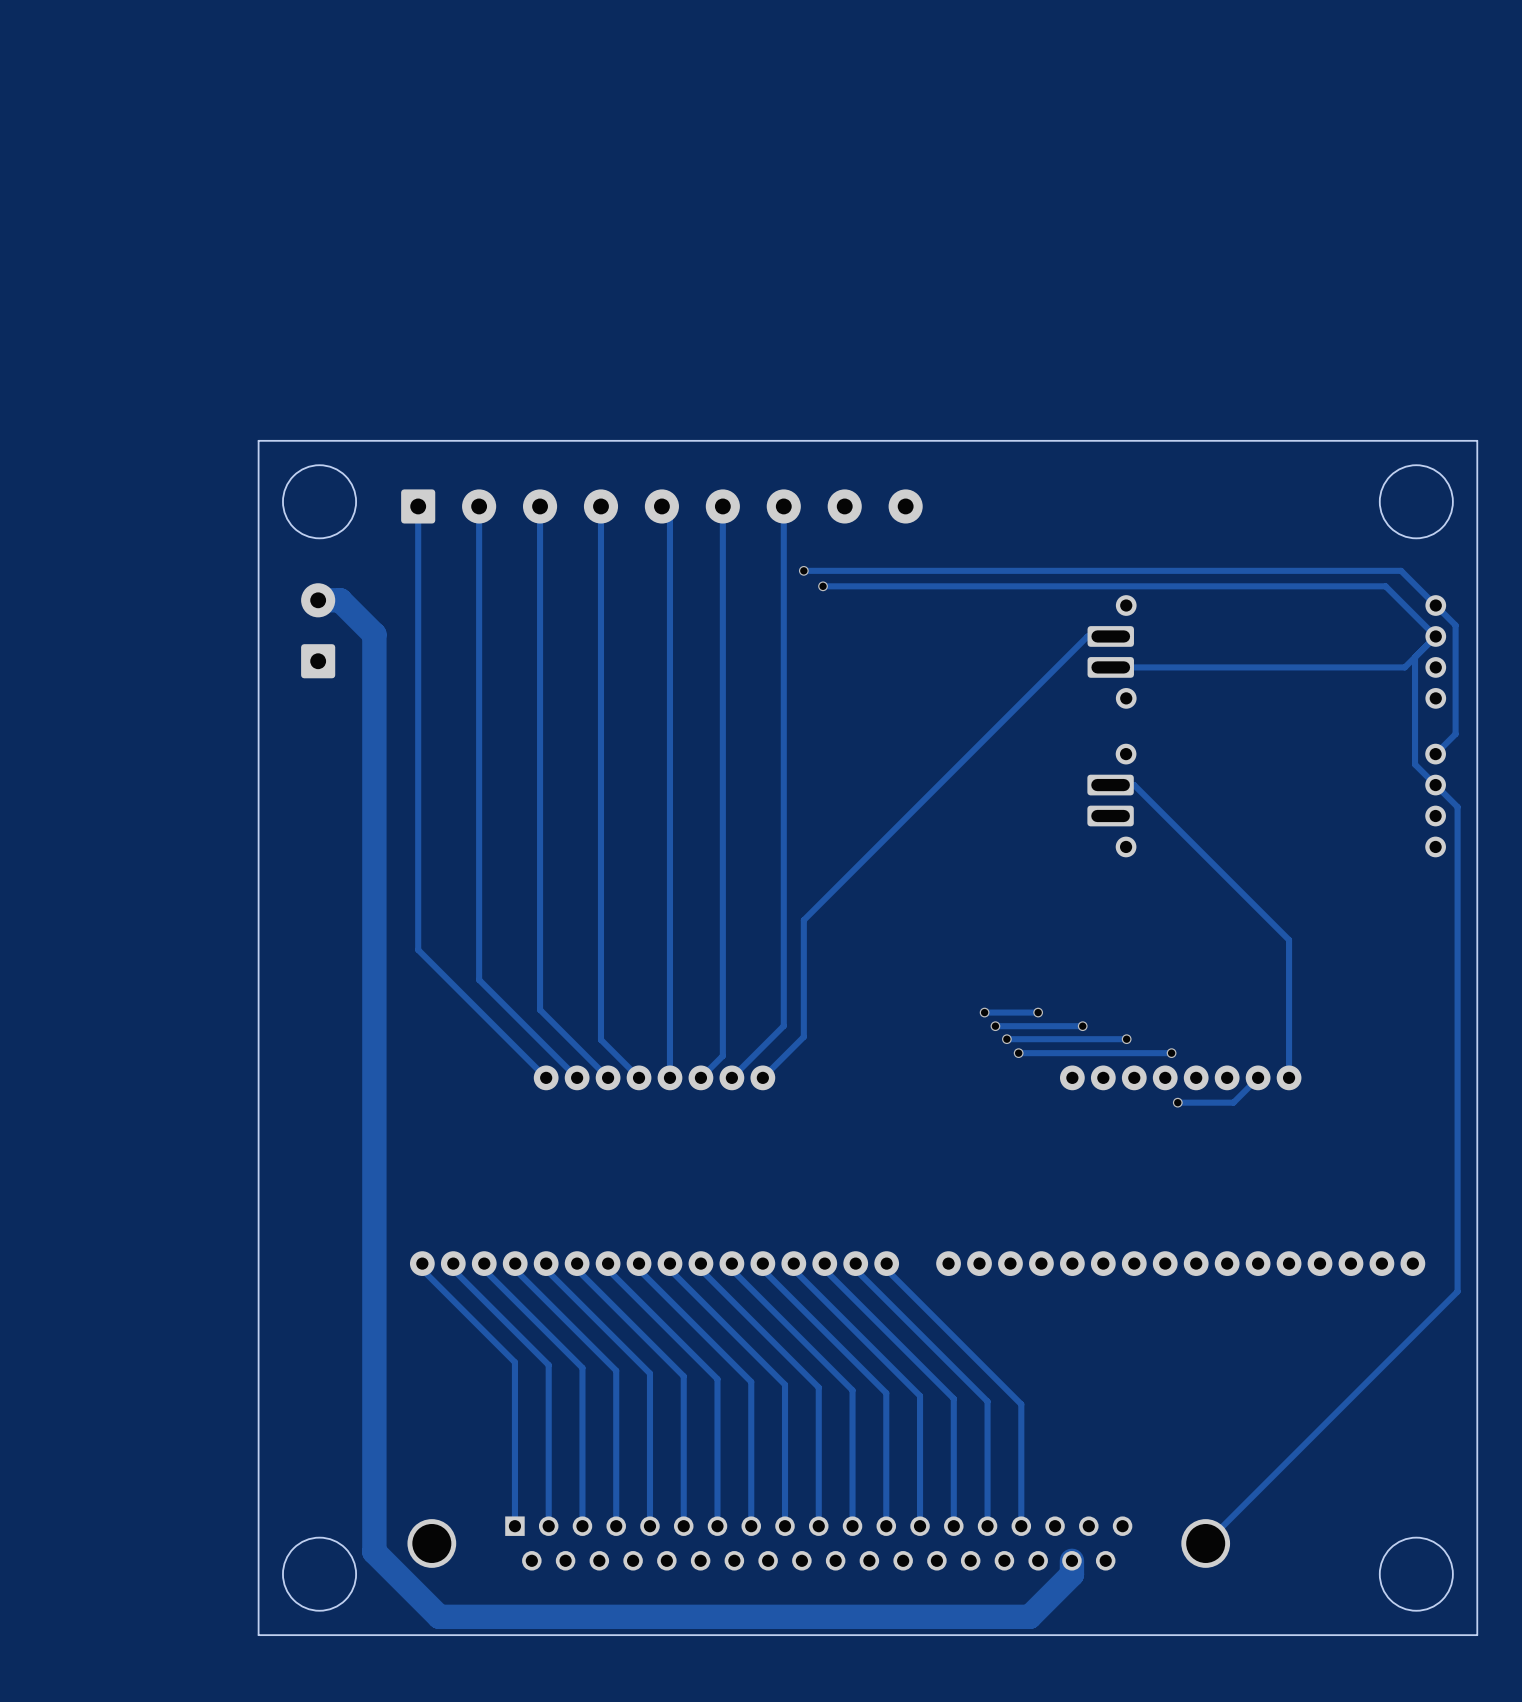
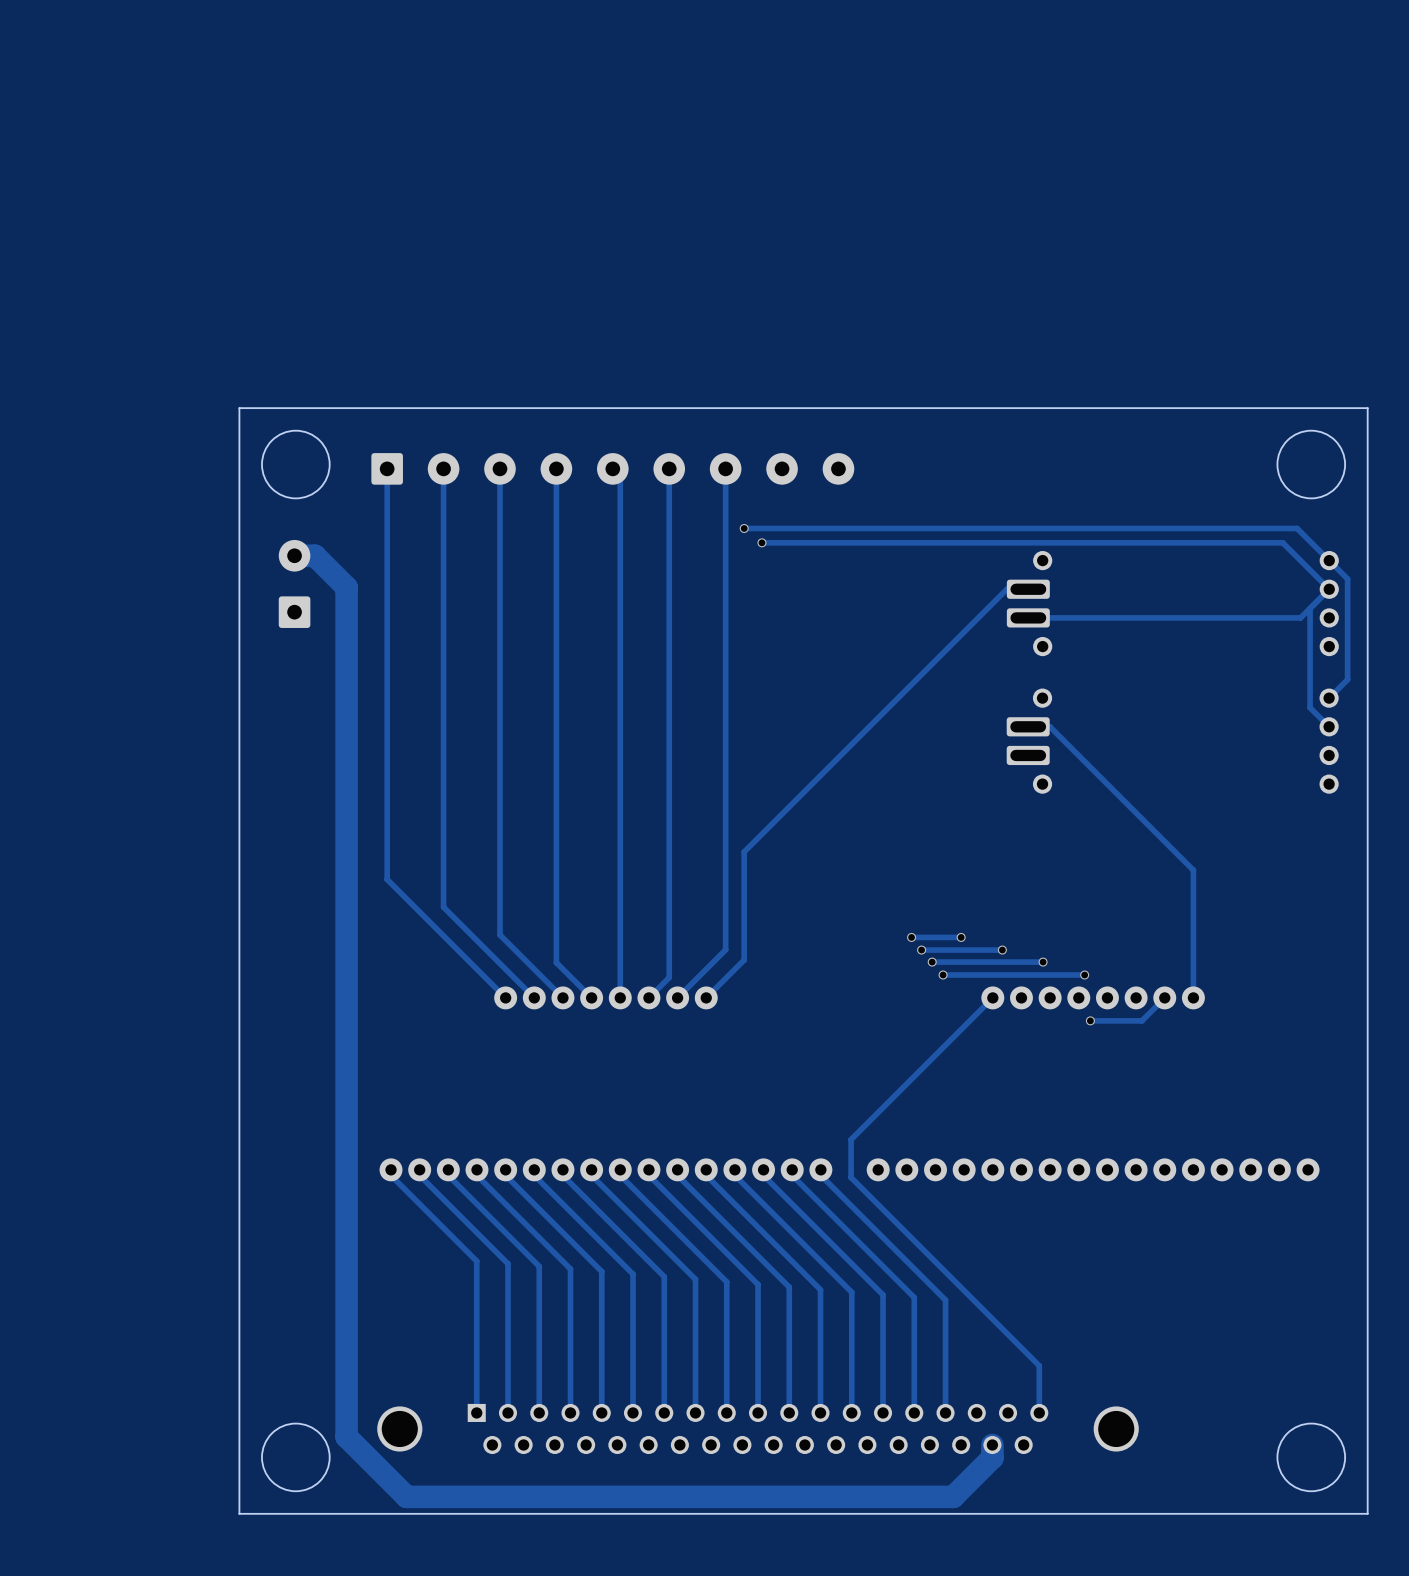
track: (1435, 785) (1457, 807) (1457, 1291) (1205, 1543) -> none
track: none -> (992, 997) (851, 1139) (851, 1177) (1039, 1365) (1039, 1412)

